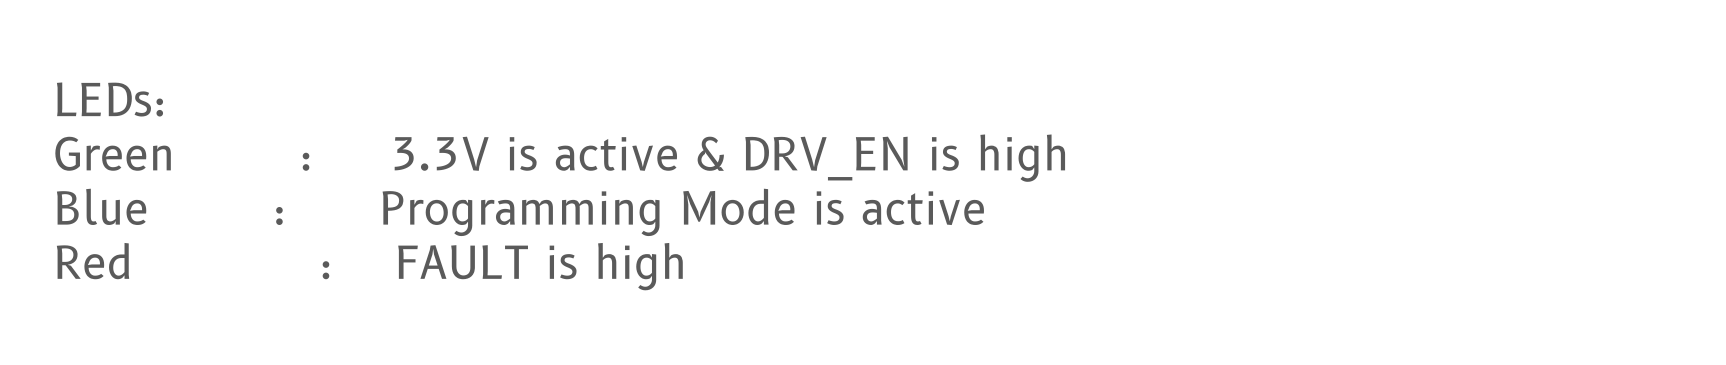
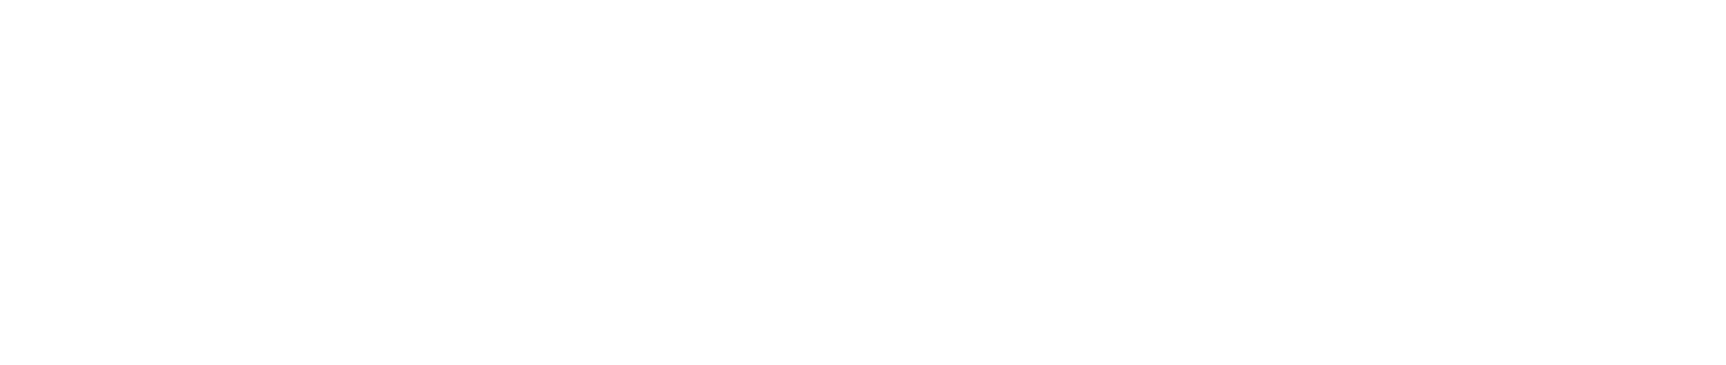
text: LEDs: (109, 99) -> none
text: Green : 3.3V is active & DRV_EN is high (560, 158) -> none
text: Blue : Programming Mode is active (520, 212) -> none
text: Red : FAULT is high (369, 266) -> none

